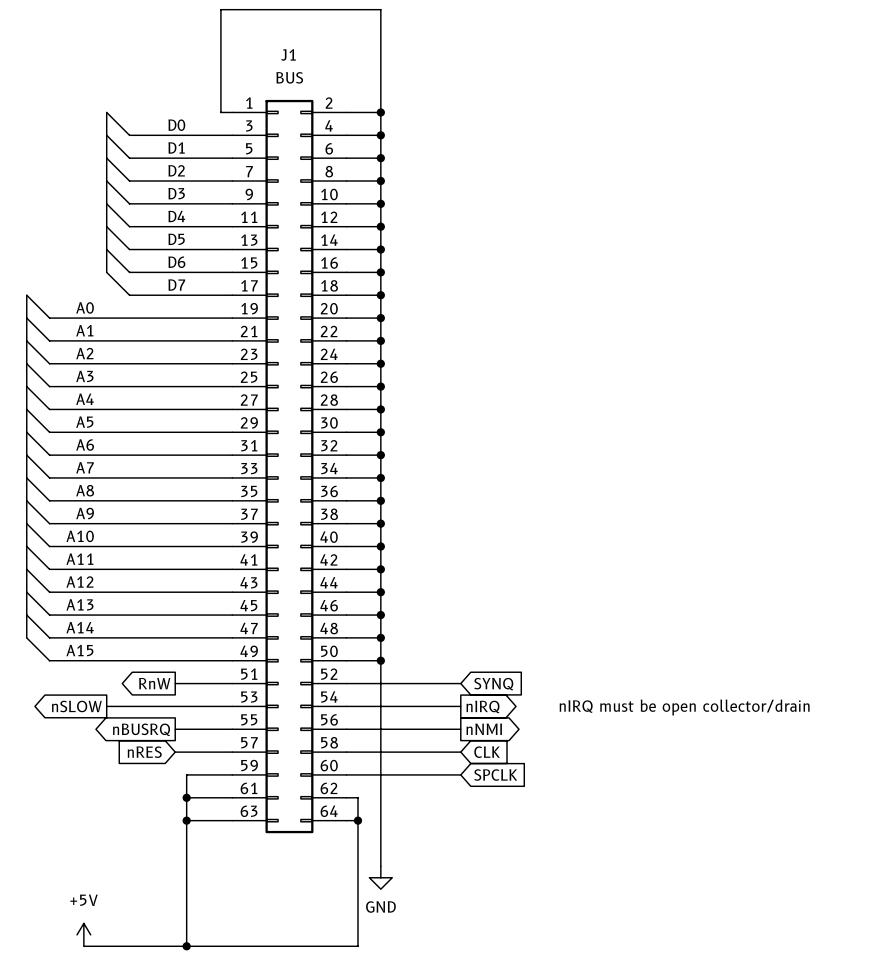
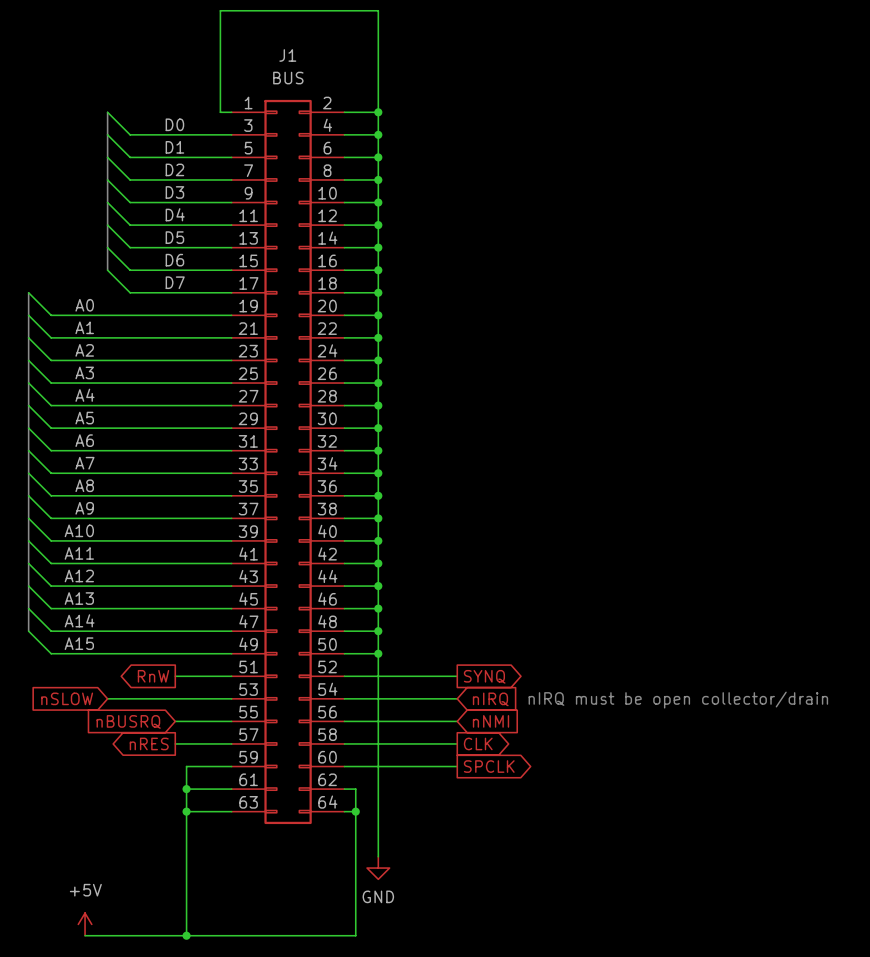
global label shape: input (493, 684) -> output (484, 676)
global label shape: output (76, 706) -> input (67, 698)
global label shape: output (483, 706) -> input (490, 699)
global label shape: output (141, 729) -> input (128, 721)
global label shape: output (484, 729) -> input (491, 721)
global label shape: input (144, 752) -> output (149, 743)
global label shape: input (487, 752) -> output (478, 743)
global label shape: input (495, 775) -> output (489, 766)

